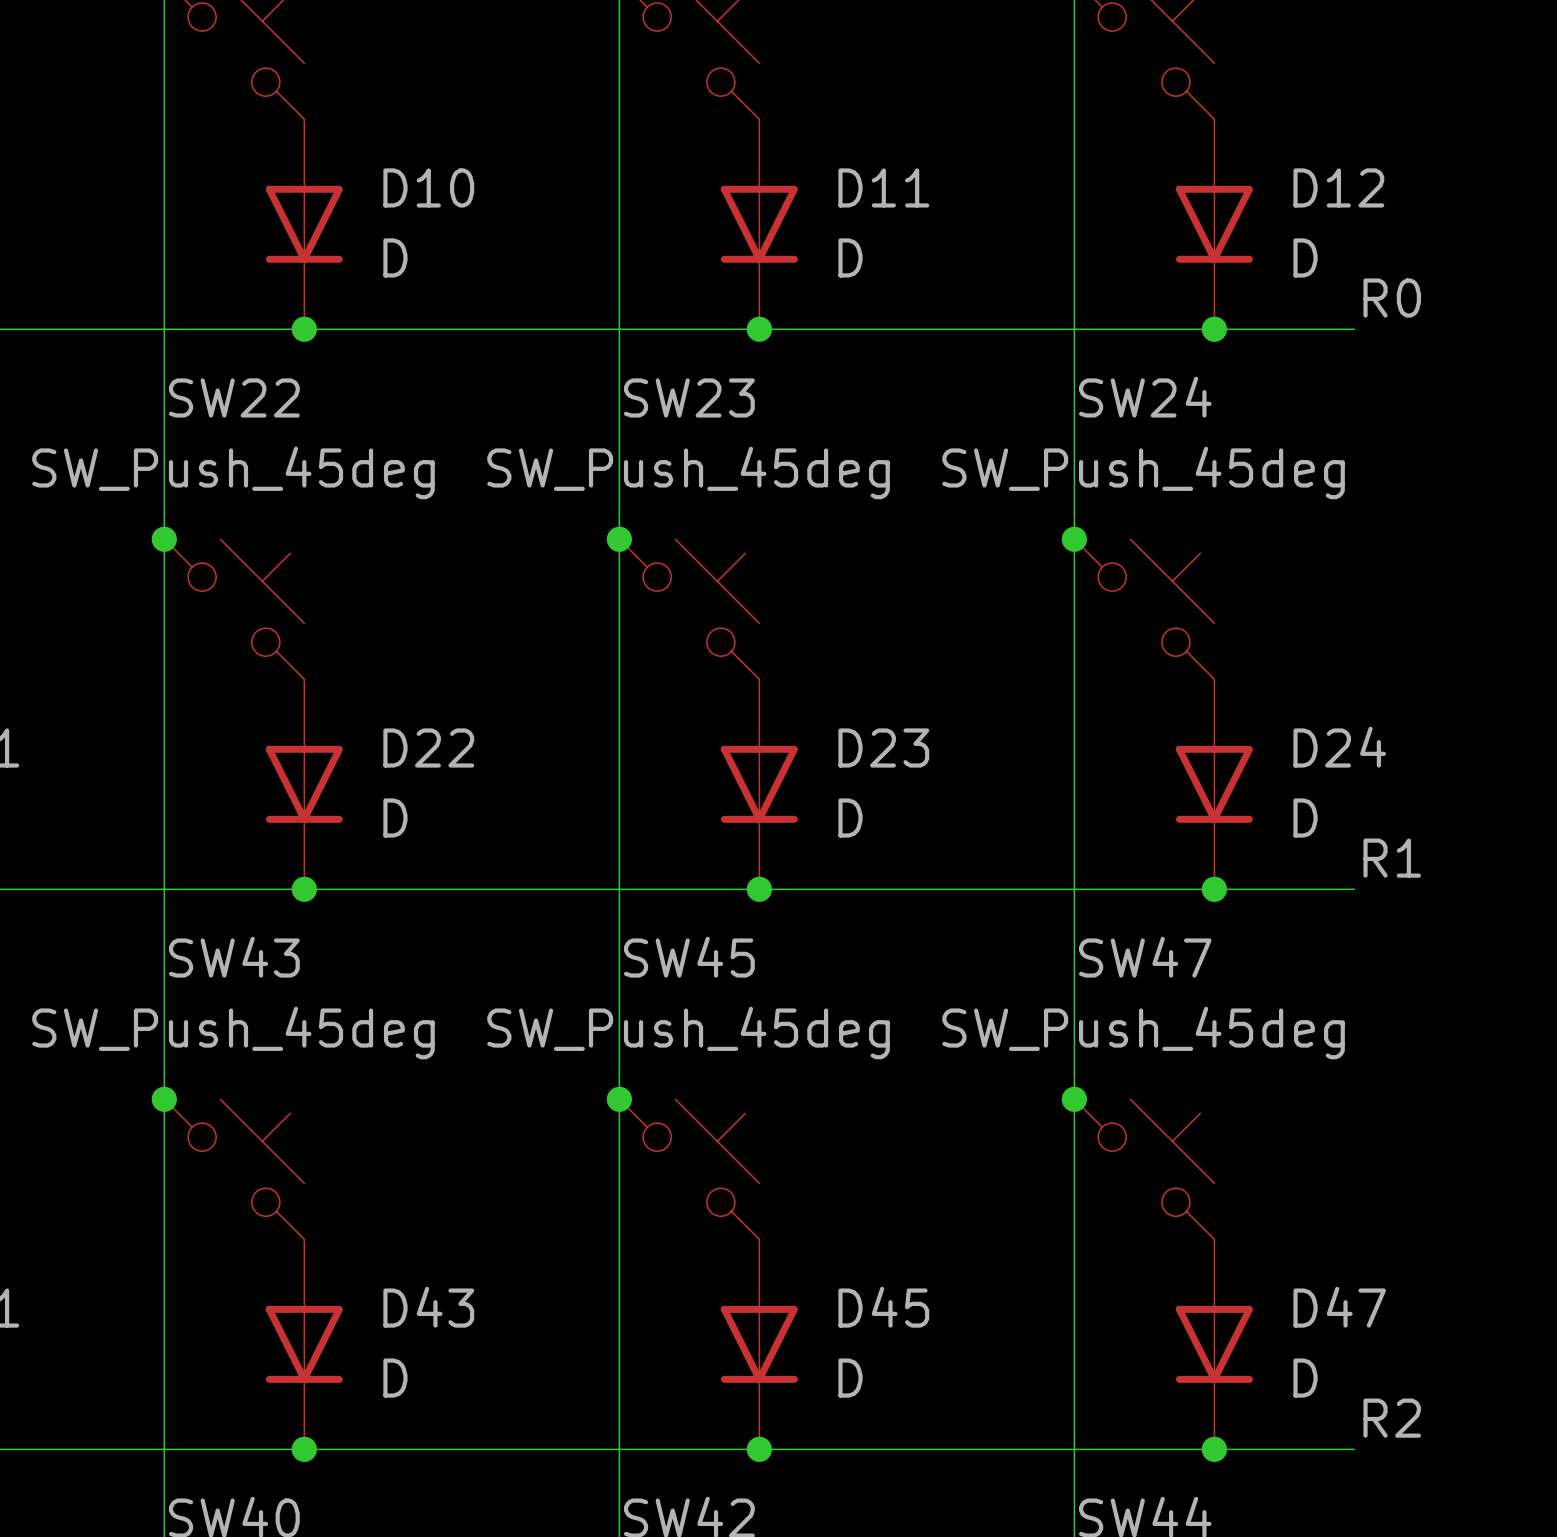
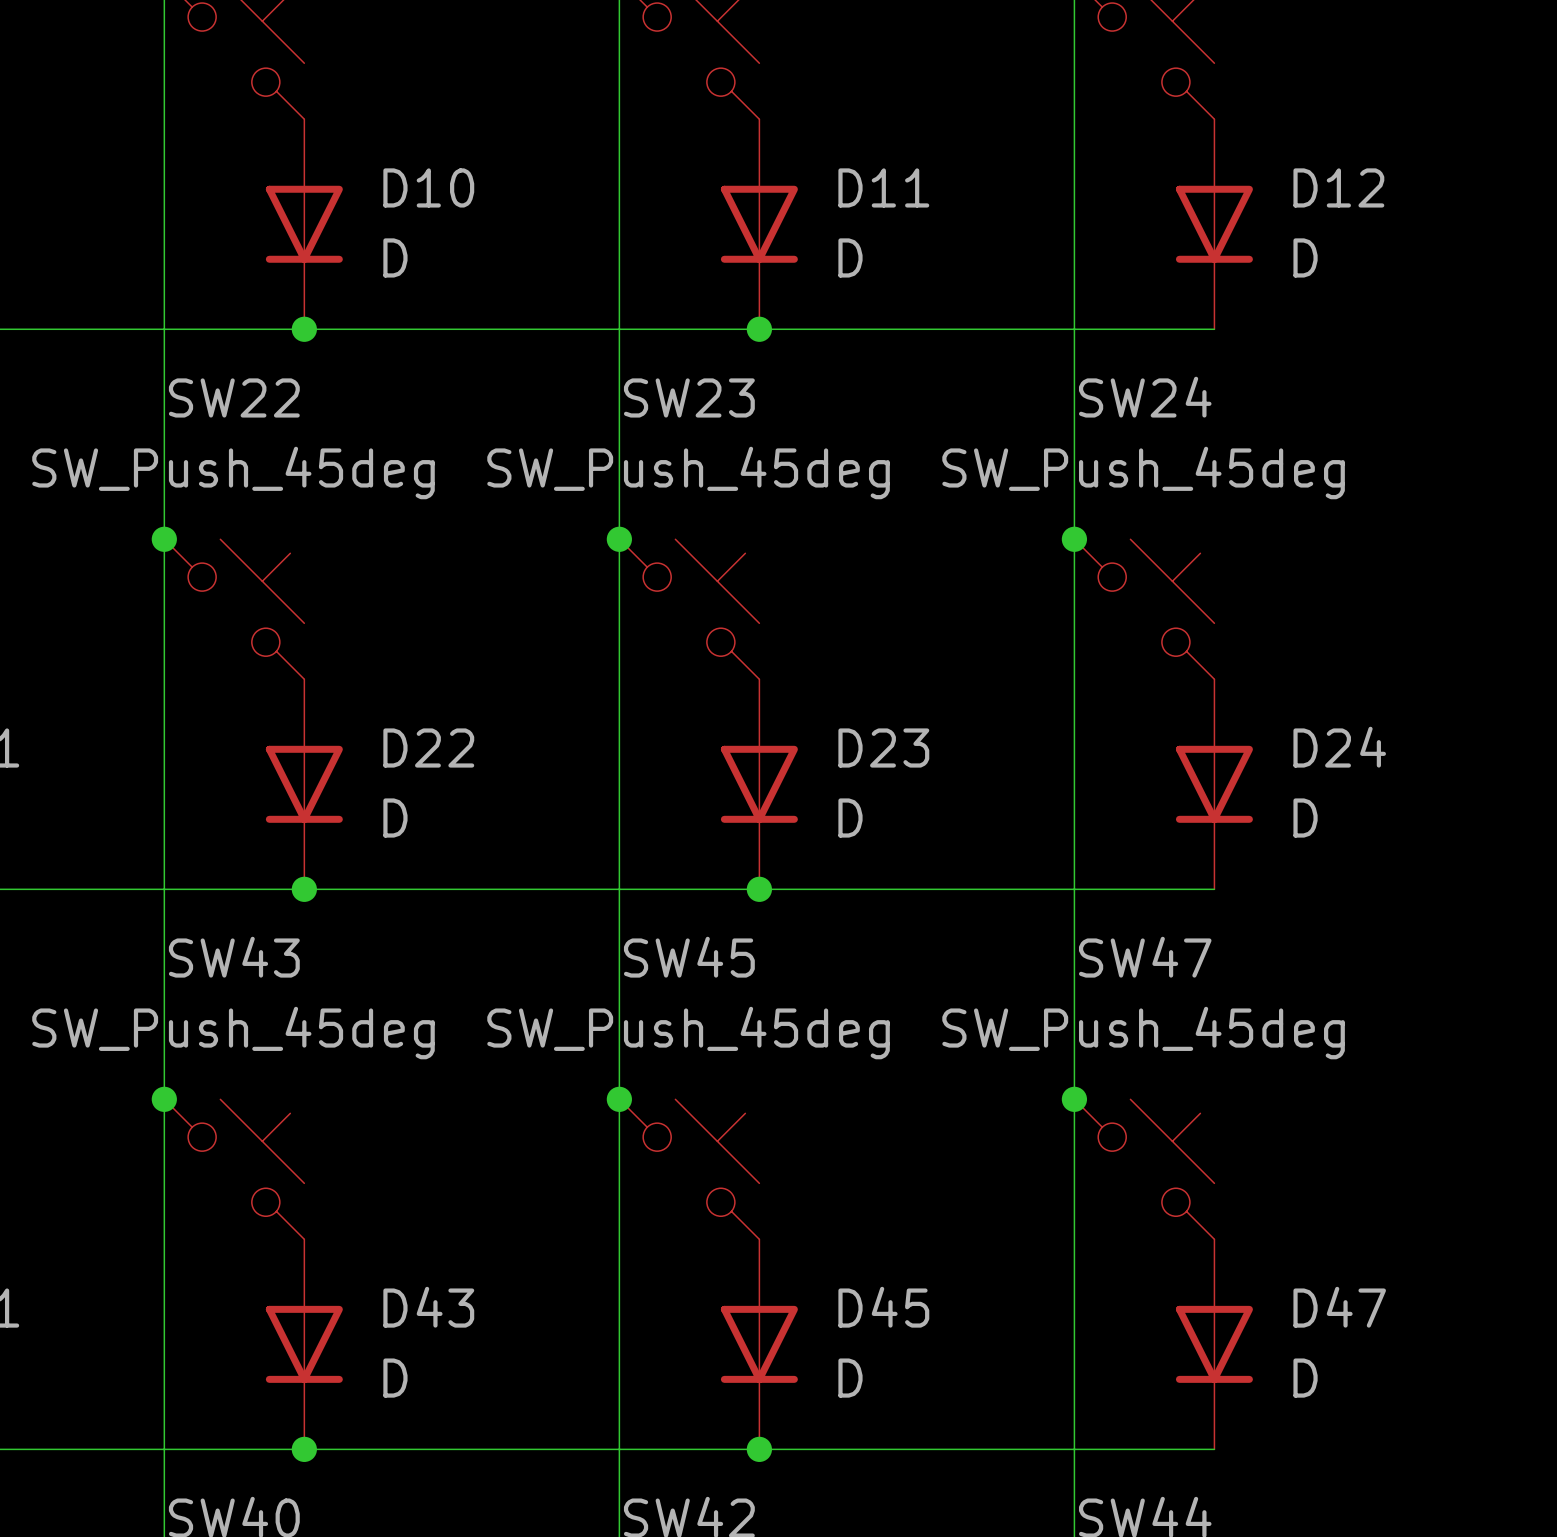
label: R0 (1392, 298) -> none
wire: (1214, 329) (1354, 329) -> none
junction: (1214, 329) -> none
label: R1 (1392, 858) -> none
wire: (1214, 889) (1354, 889) -> none
junction: (1214, 889) -> none
label: R2 (1392, 1418) -> none
wire: (1214, 1449) (1354, 1449) -> none
junction: (1214, 1449) -> none

